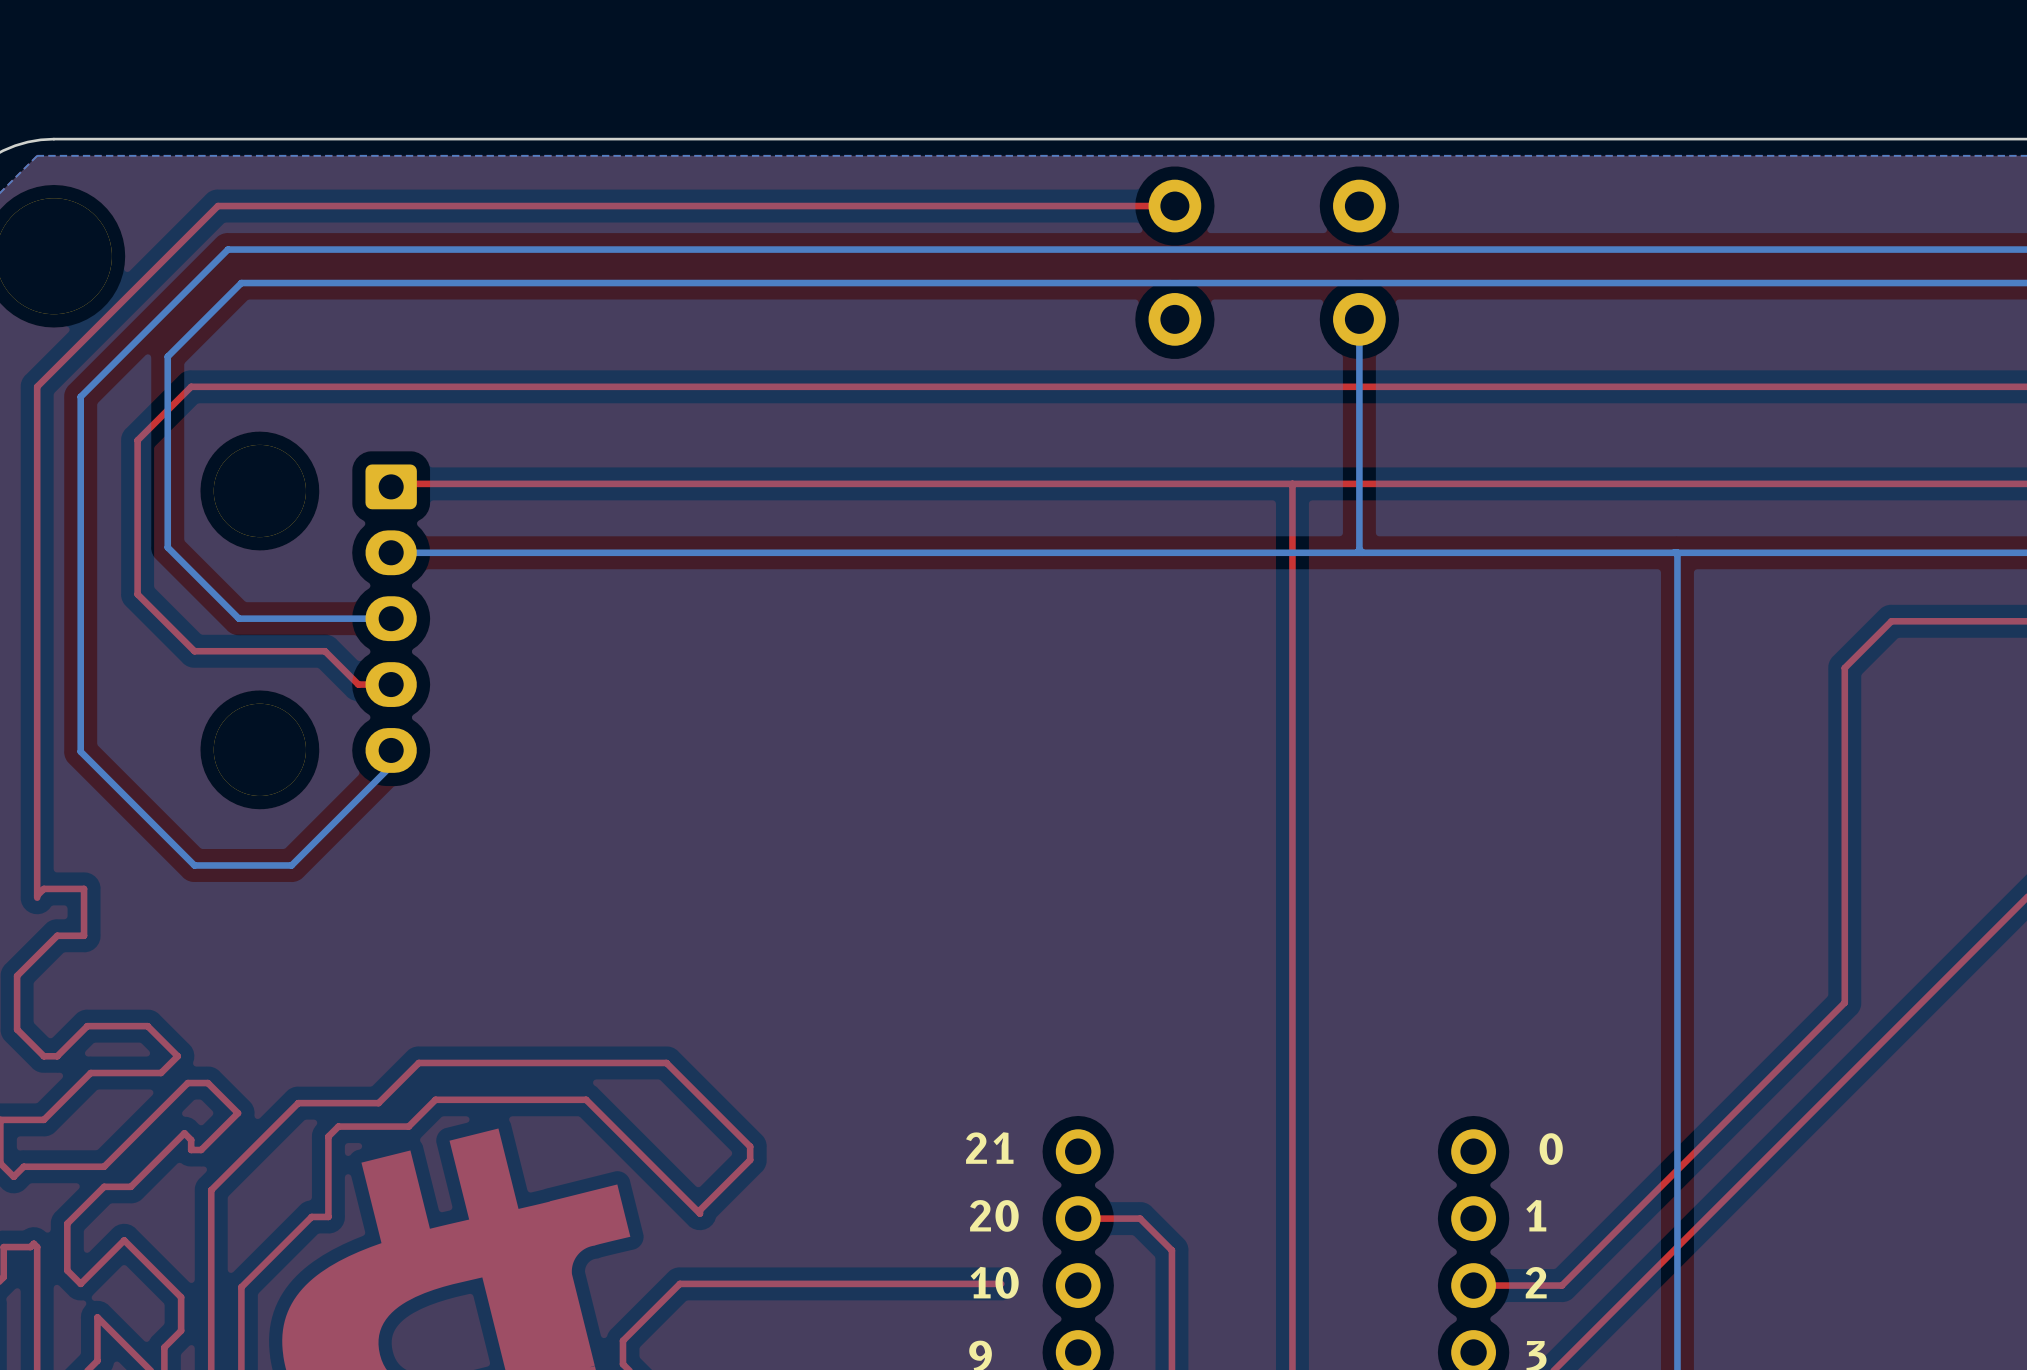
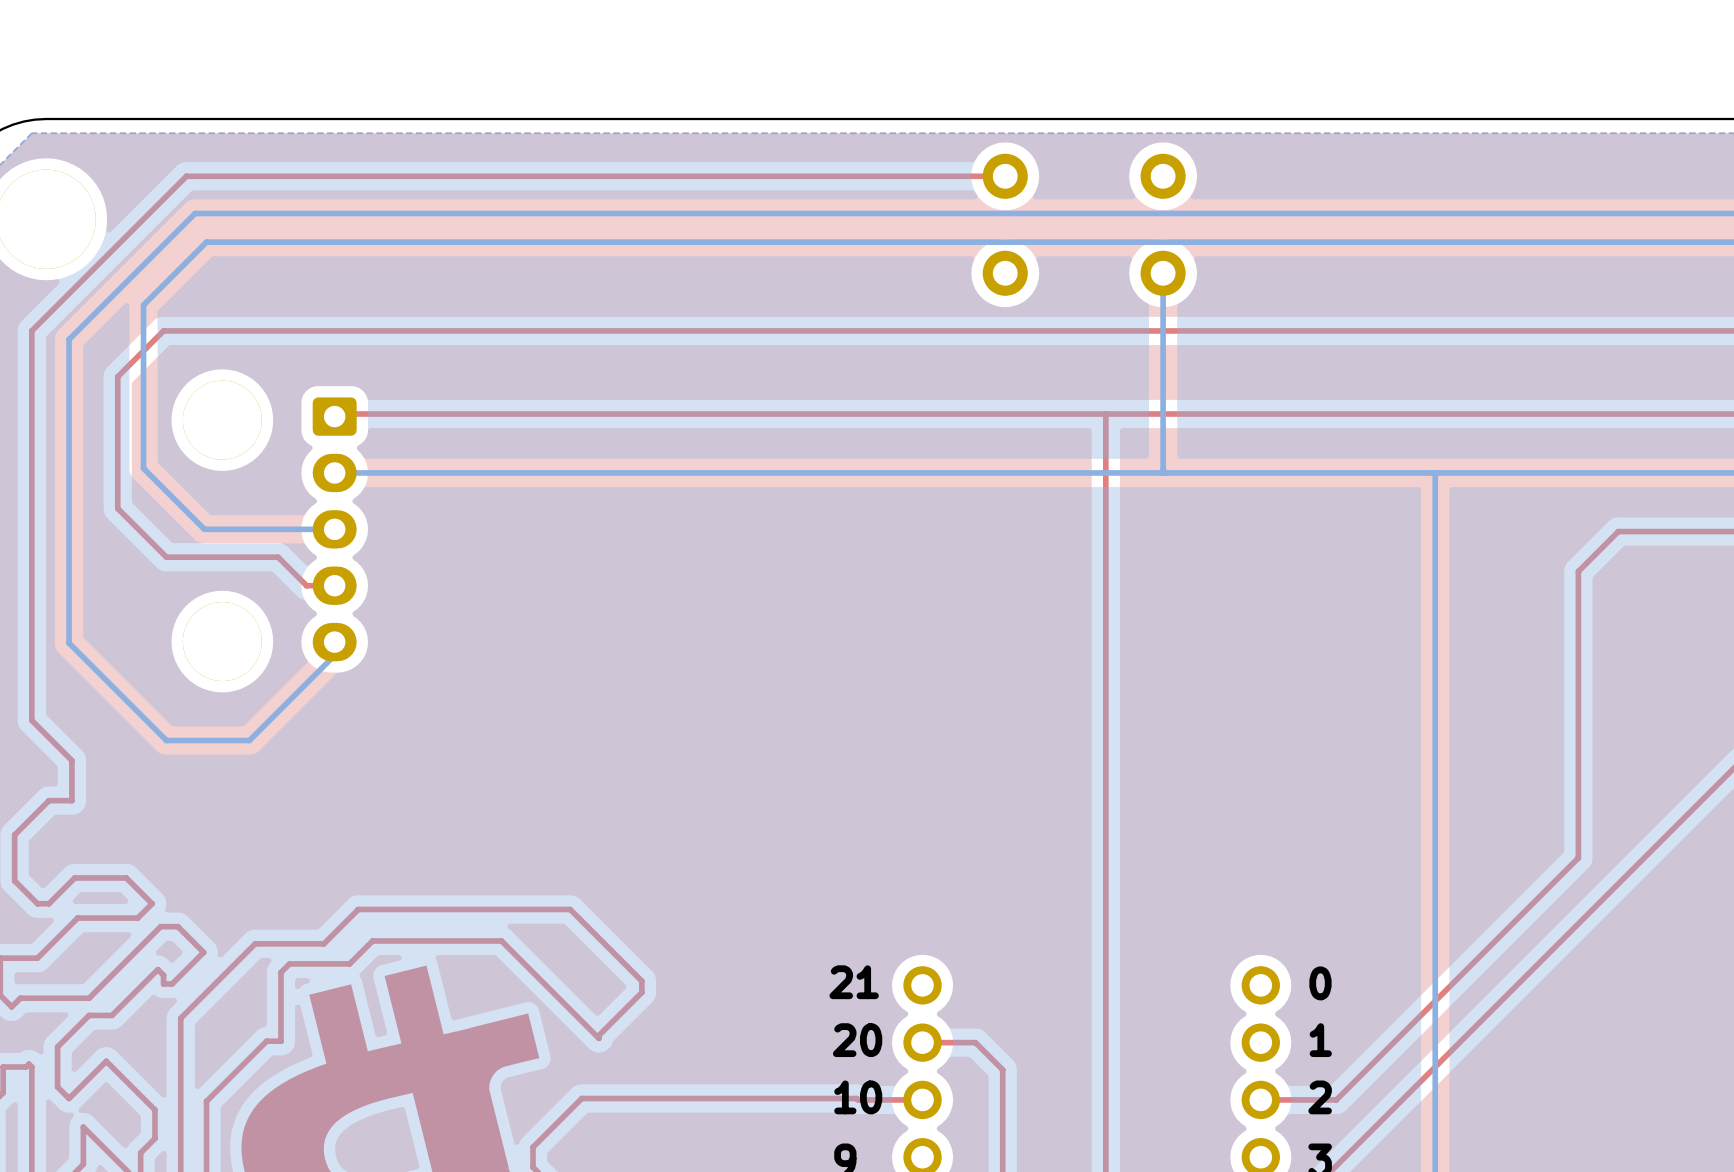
top track: (37, 842) (37, 897) -> (31, 720) (71, 760)
top track: (84, 888) (43, 888) (37, 895) -> none
top track: none -> (856, 1098) (922, 1099)

